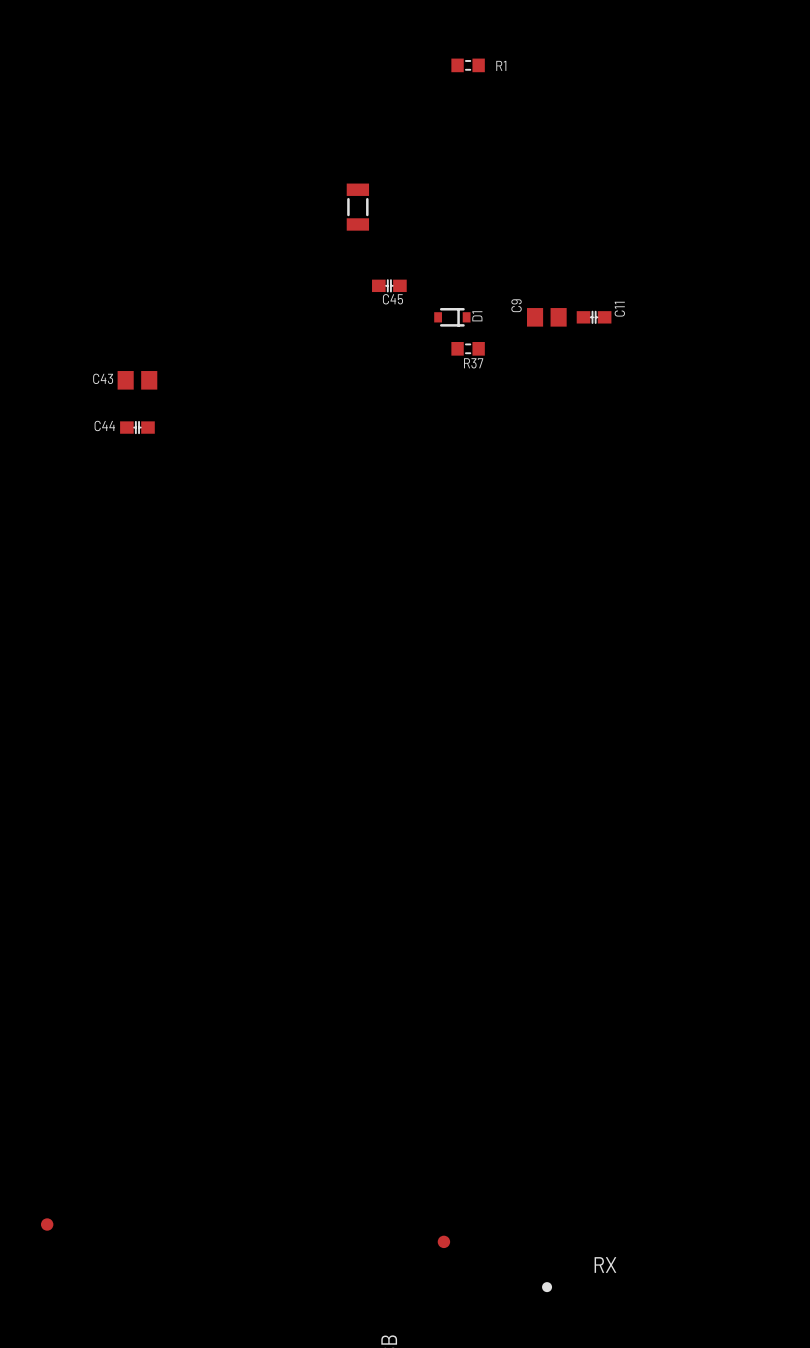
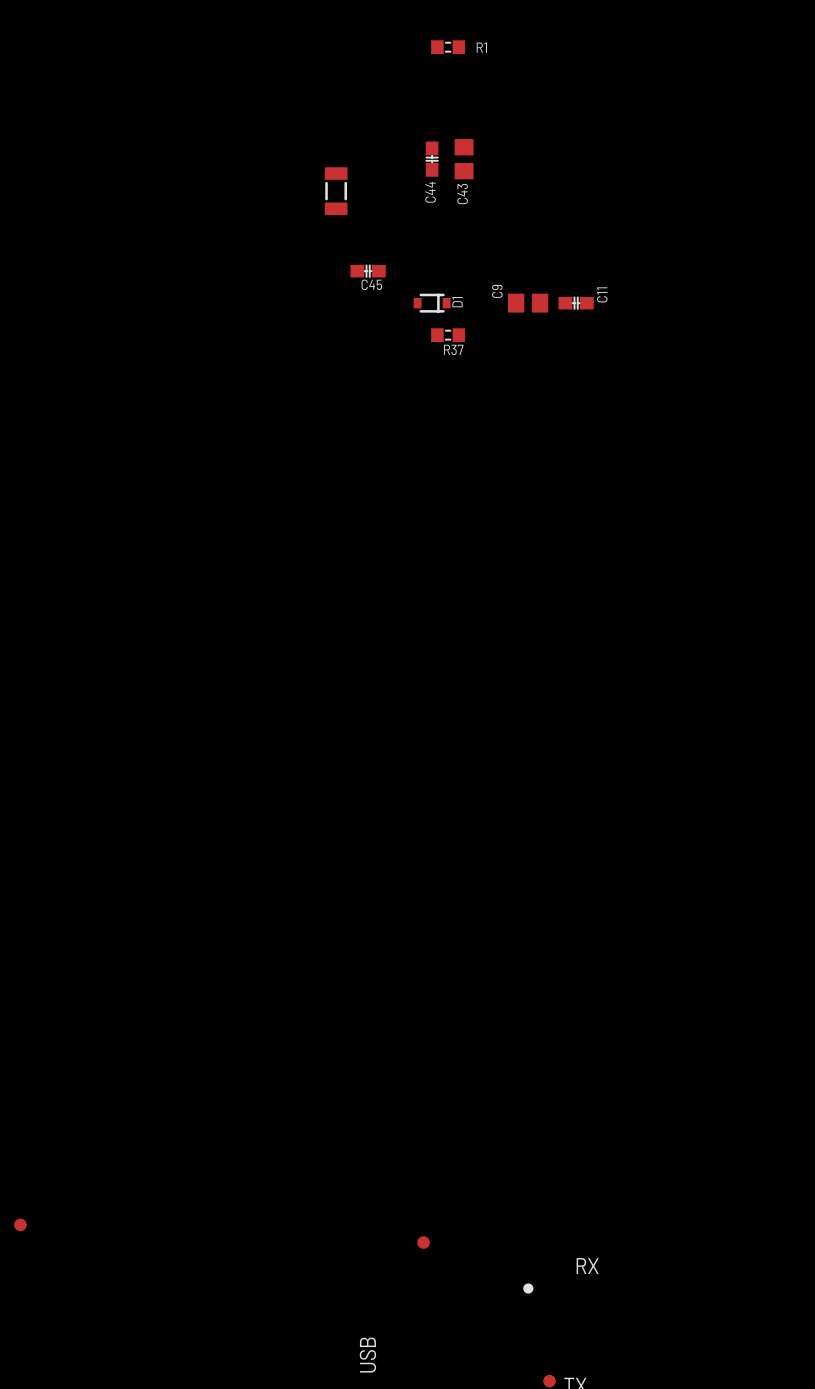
C43 name position: C43 (103, 378) -> C43 (462, 194)
C43 rotation: 0° (137, 380) -> 90° clockwise (464, 159)
C43 position: (137, 380) -> (464, 159)
C44 name position: C44 (104, 425) -> C44 (430, 192)
C44 rotation: 0° (137, 427) -> 90° clockwise (432, 159)
C44 position: (137, 427) -> (432, 159)

